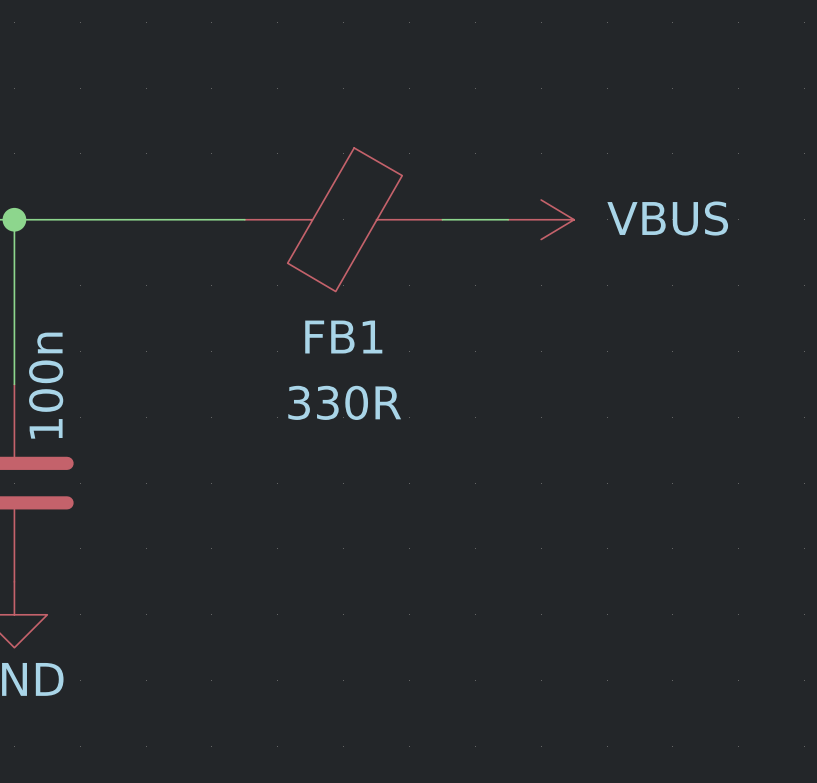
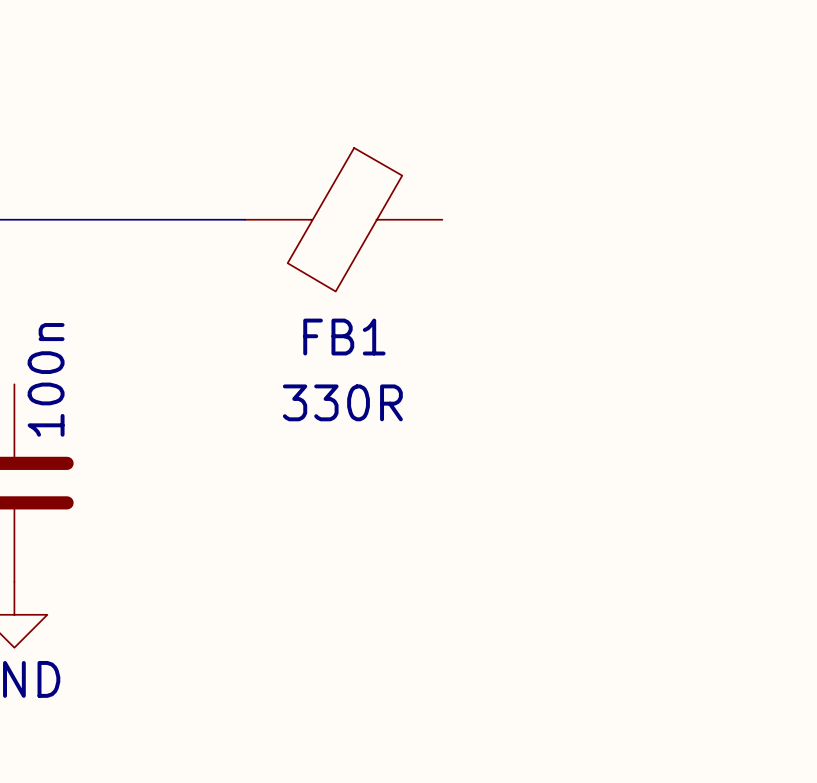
wire: (14, 219) (14, 384) -> none
junction: (14, 219) -> none
wire: (442, 219) (508, 219) -> none
power symbol: VBUS (541, 219) -> none

